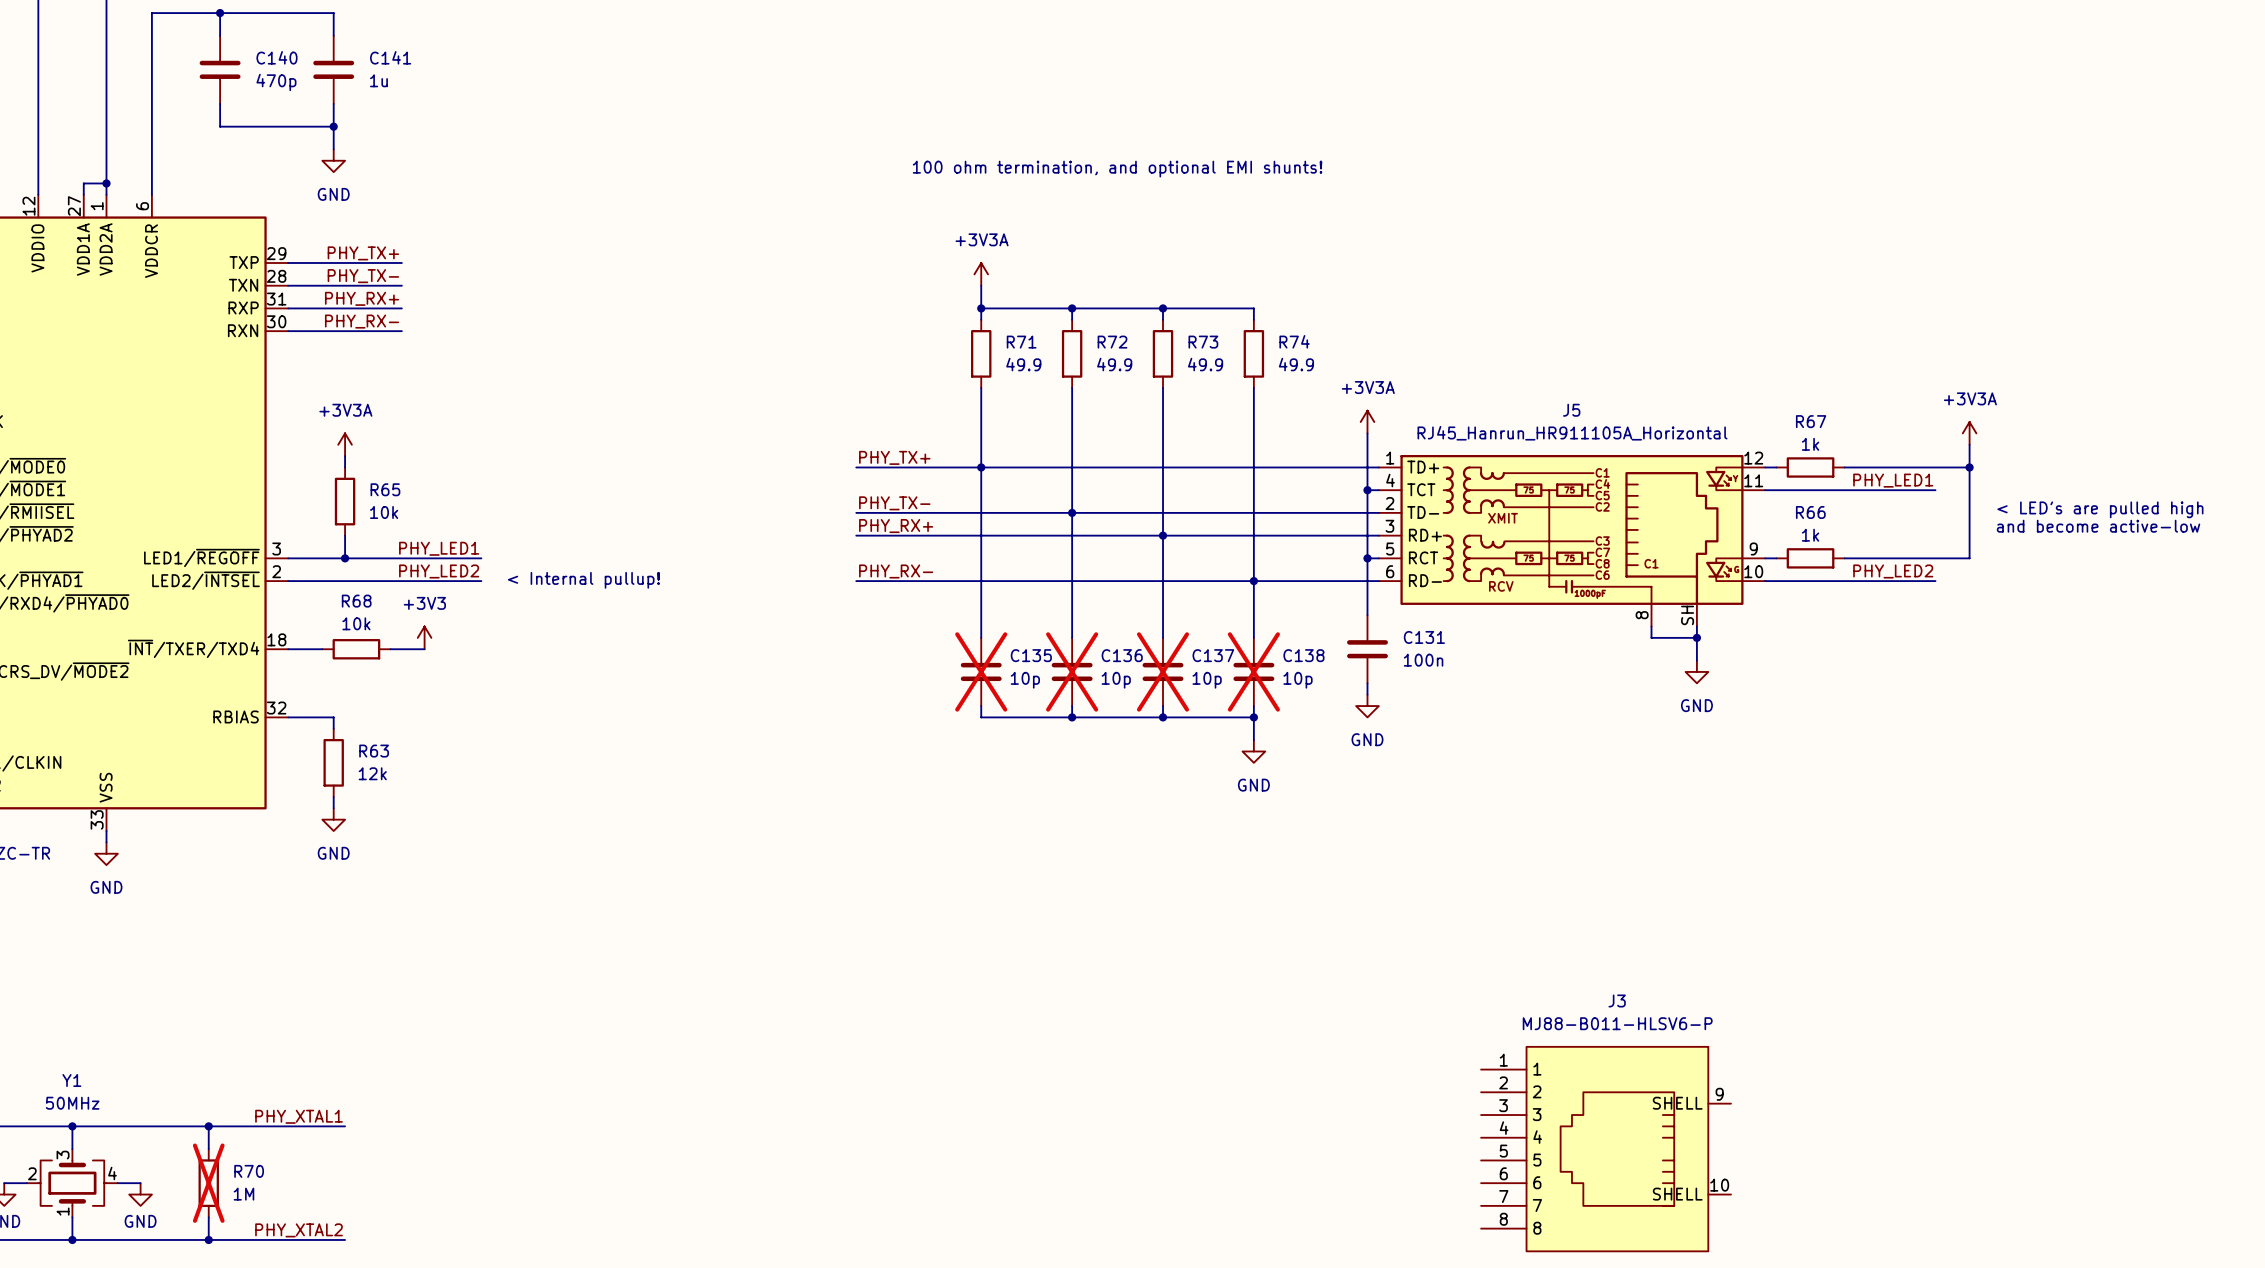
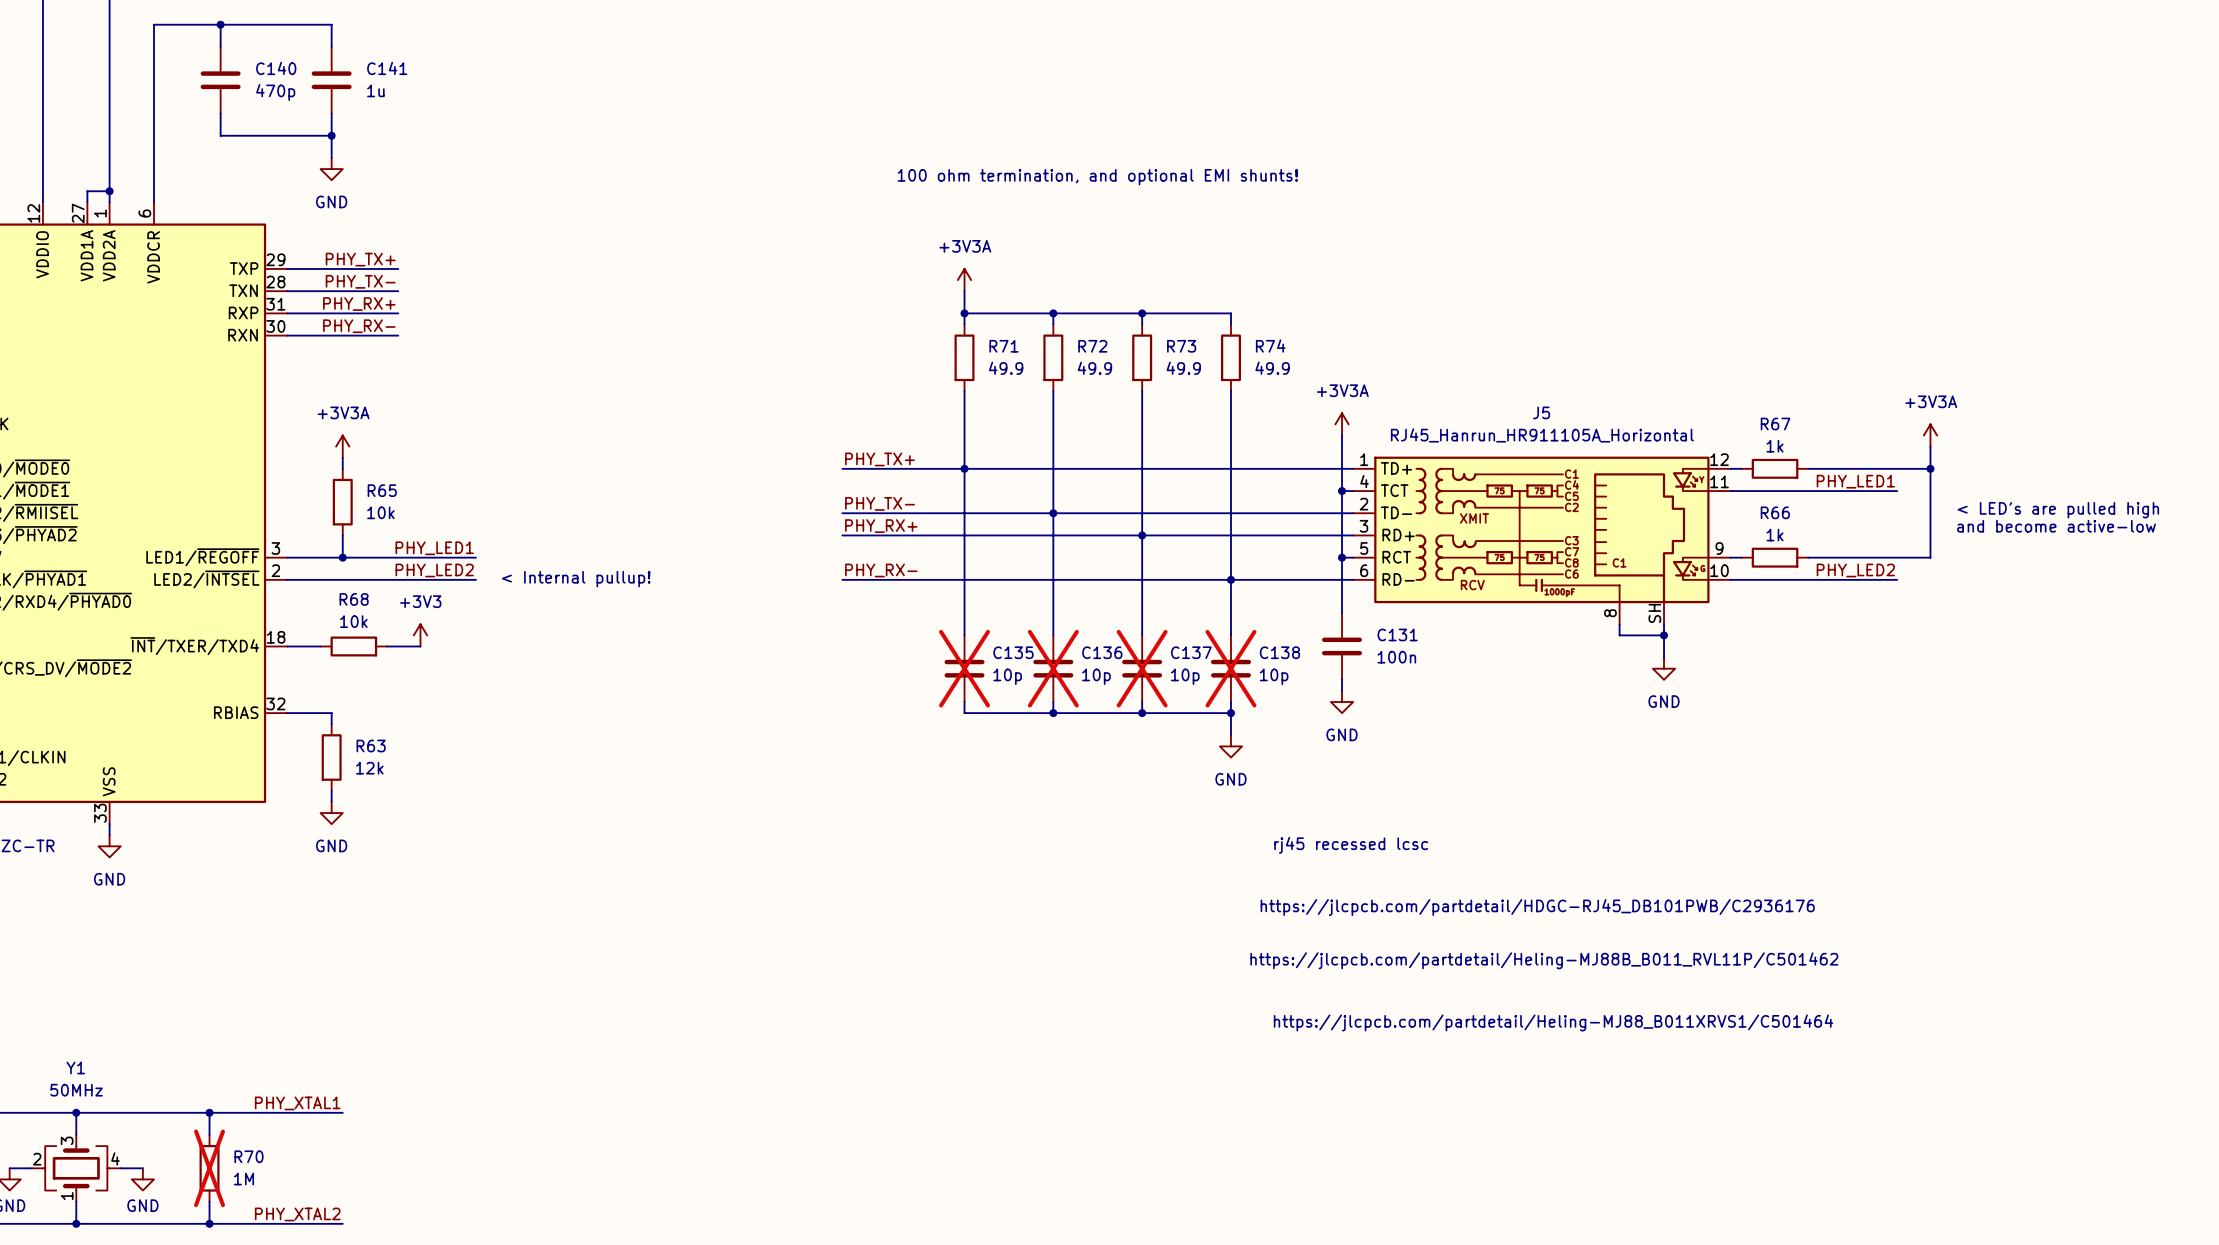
text: none -> rj45 recessed lcsc (1351, 845)
text: none -> https://jlcpcb.com/partdetail/HDGC-RJ45_DB101PWB/C2936176 (1537, 907)
text: none -> https://jlcpcb.com/partdetail/Heling-MJ88B_B011_RVL11P/C501462 (1544, 960)
text: none -> https://jlcpcb.com/partdetail/Heling-MJ88_B011XRVS1/C501464 (1553, 1022)
J3: MJ88-B011-HLSV6-P (1606, 1149) -> none

